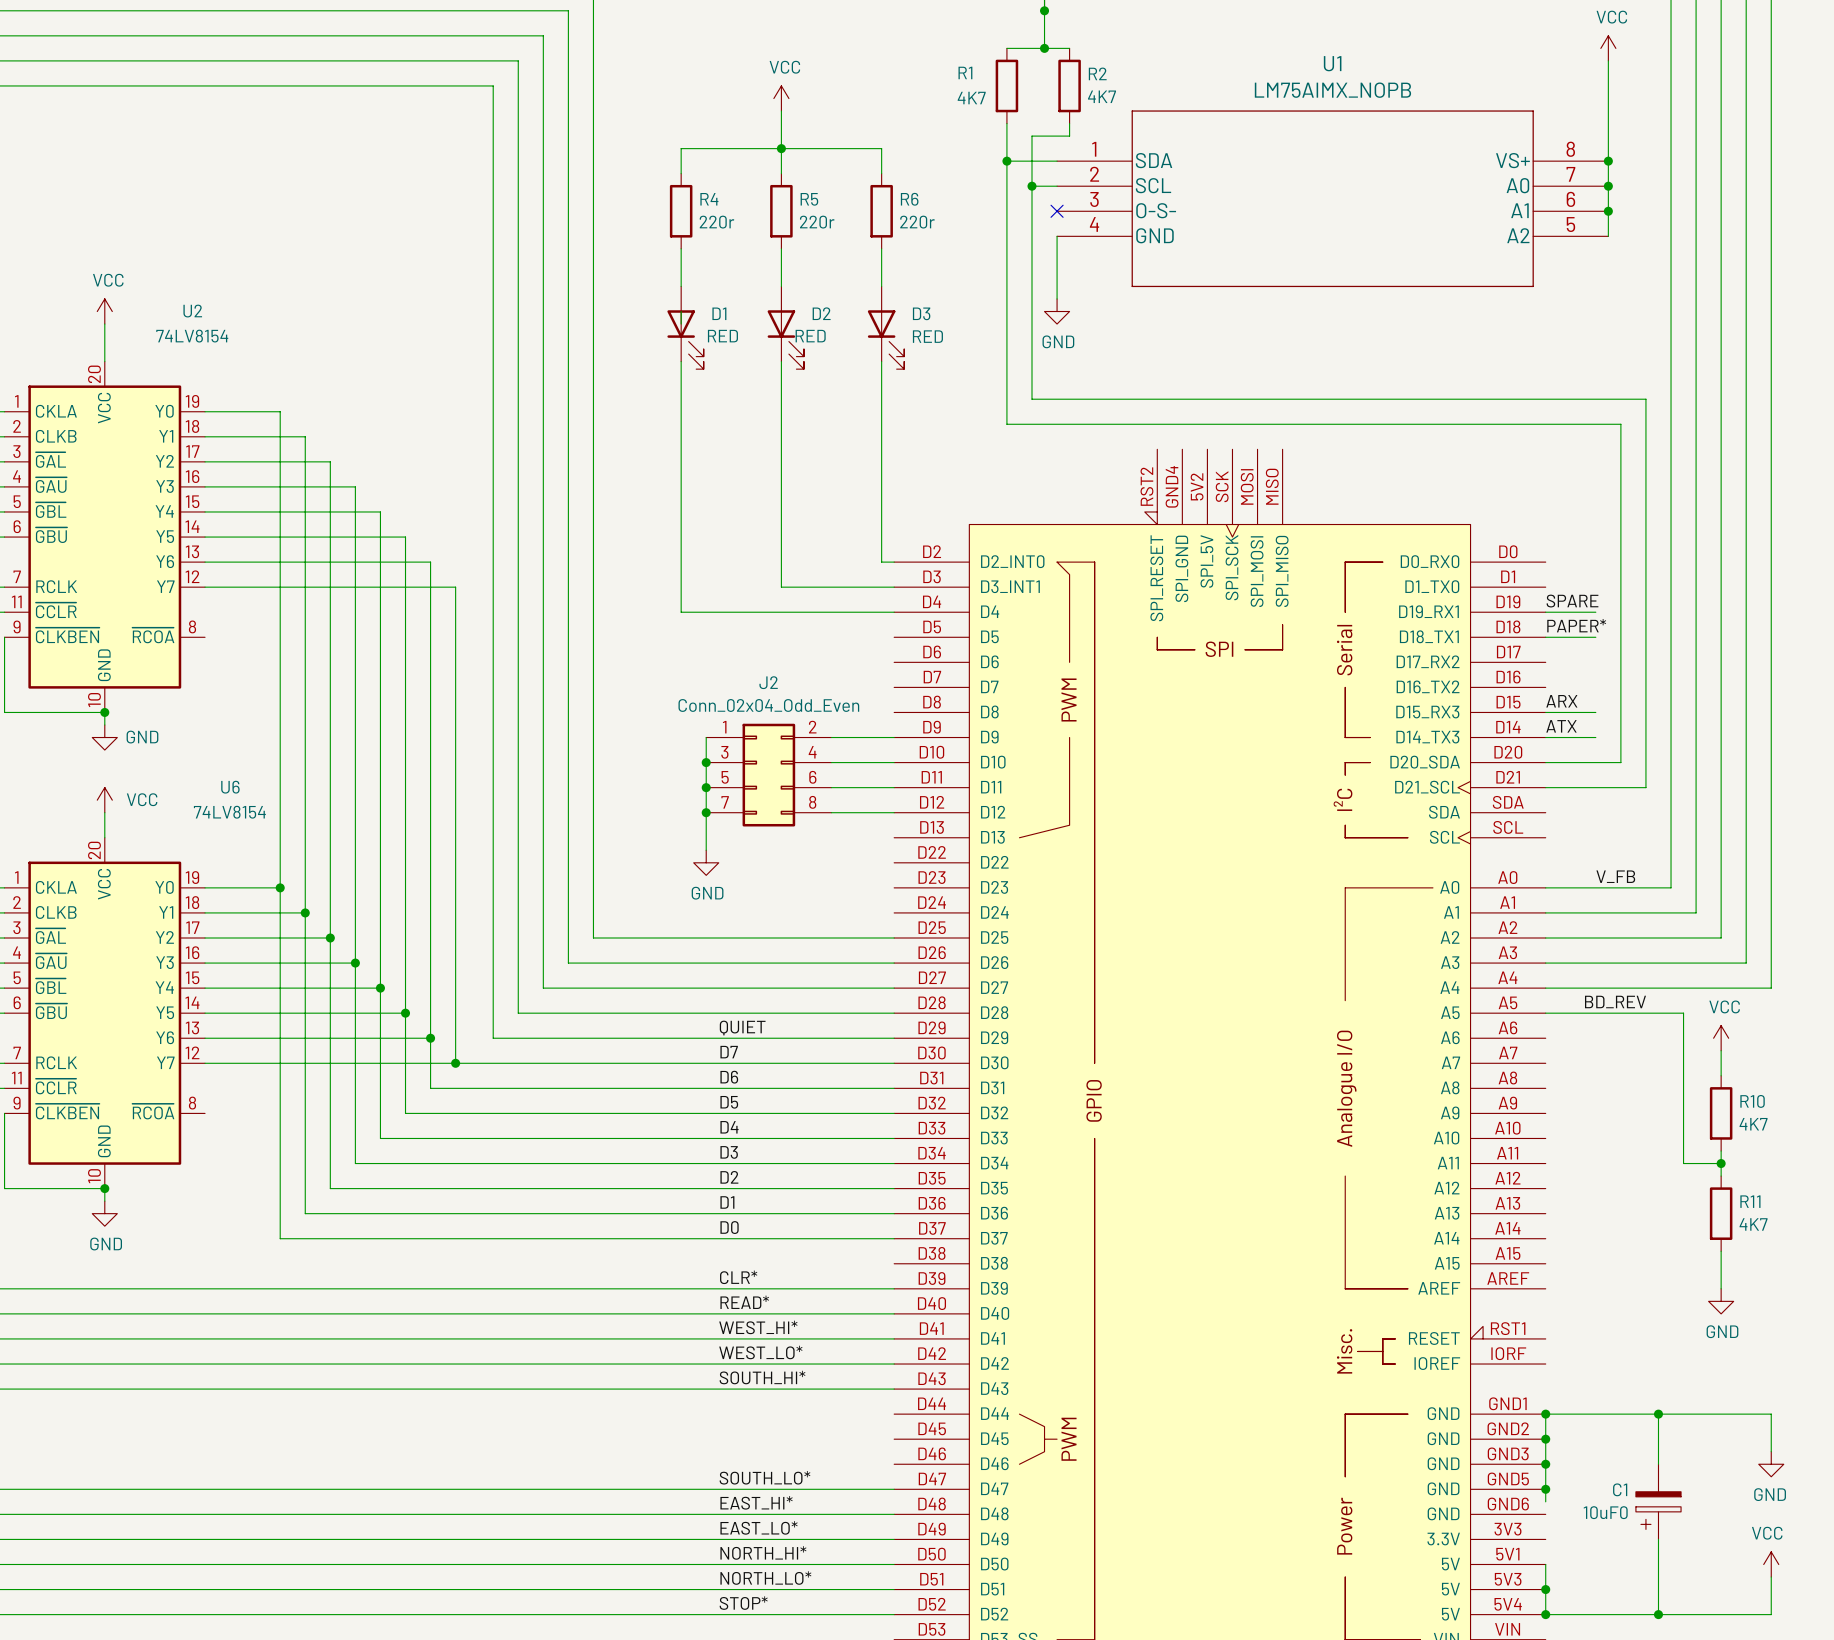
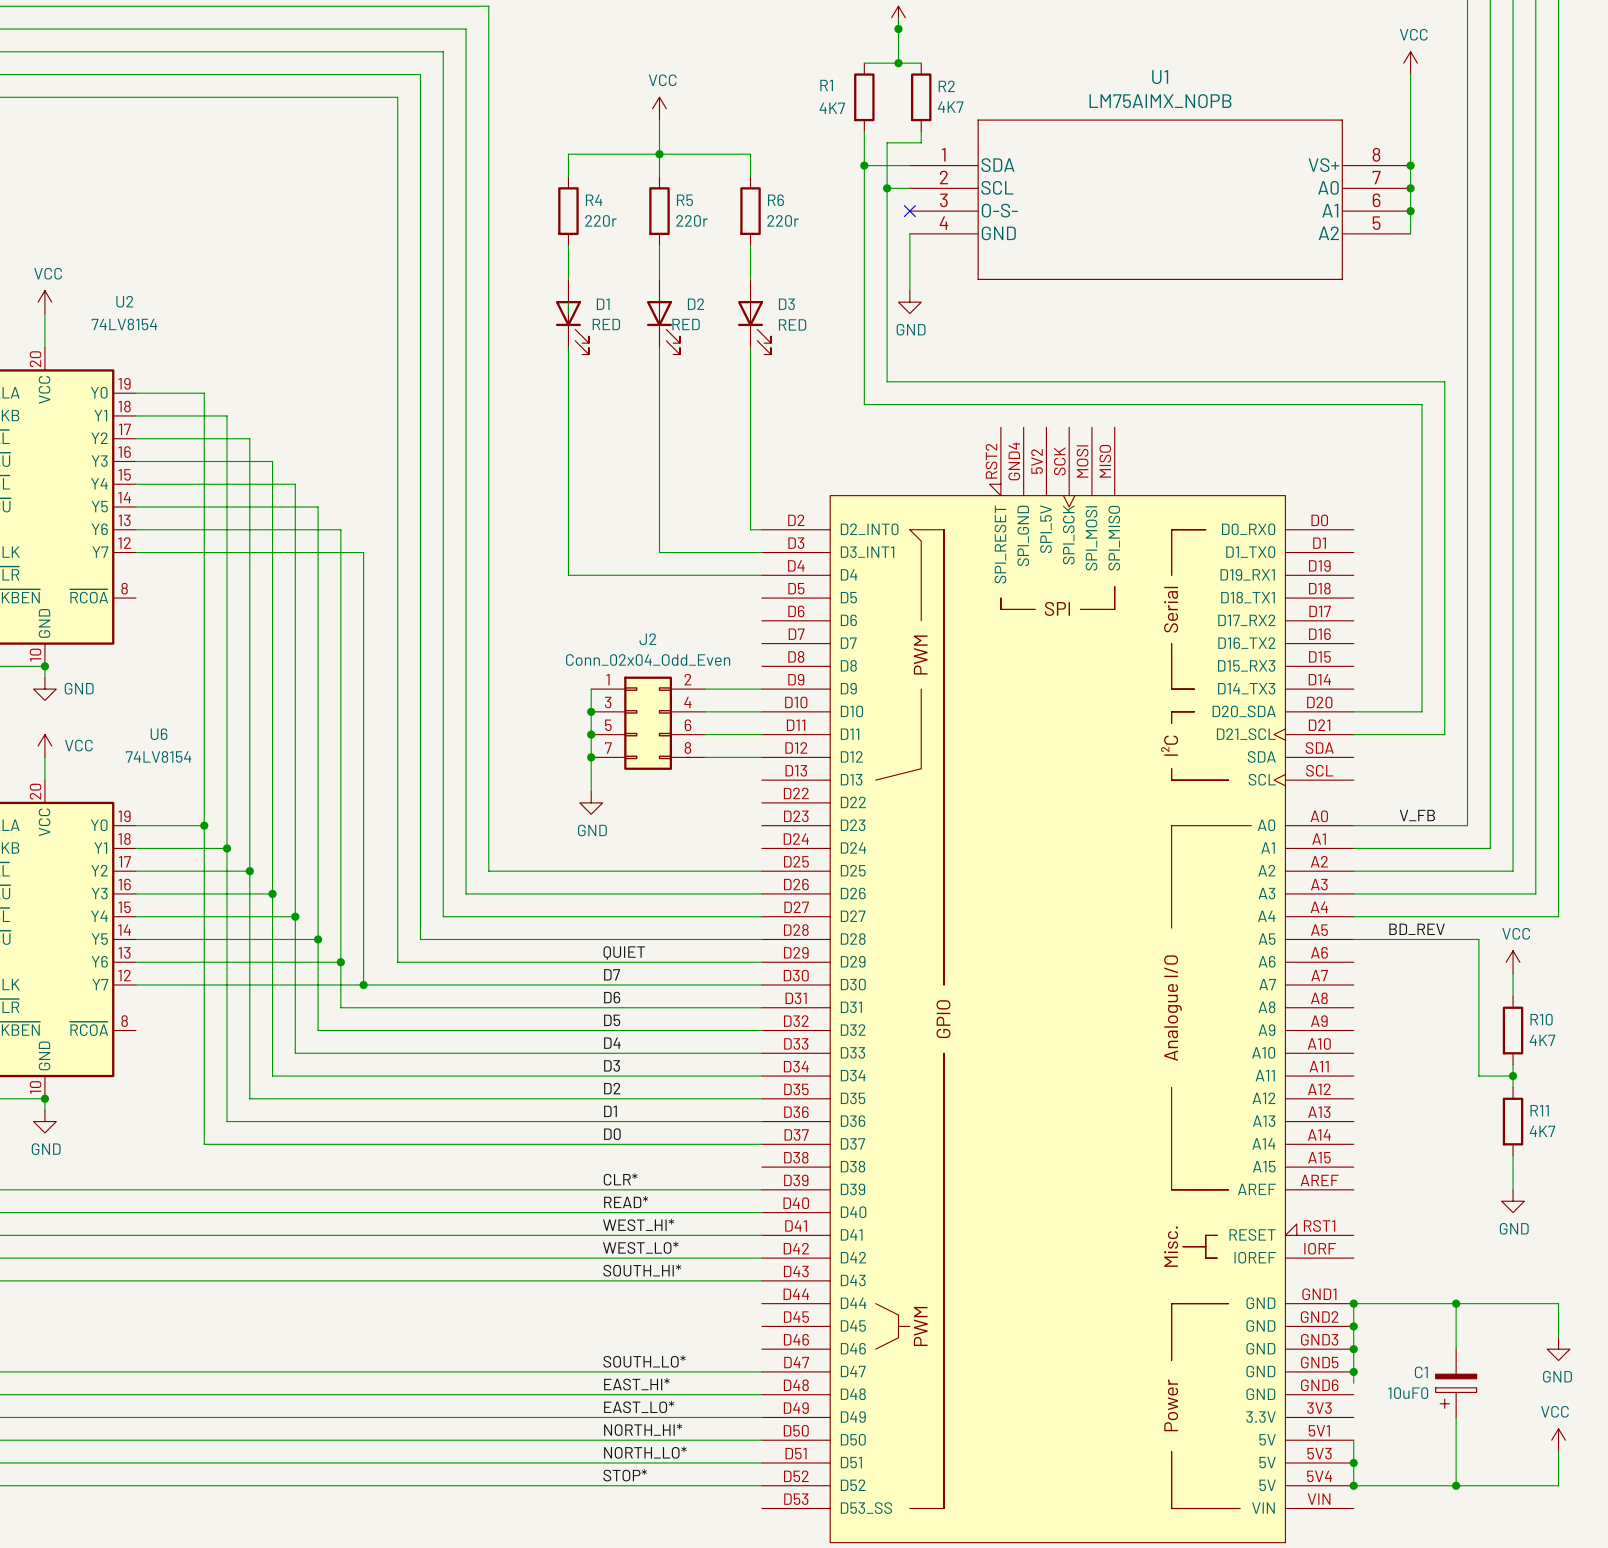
label: SPARE (1572, 601) -> none
wire: (1545, 612) (1595, 612) -> none
label: PAPER* (1576, 625) -> none
wire: (1545, 637) (1595, 637) -> none
label: ARX (1561, 701) -> none
wire: (1545, 712) (1595, 712) -> none
label: ATX (1561, 726) -> none
wire: (1545, 737) (1595, 737) -> none

